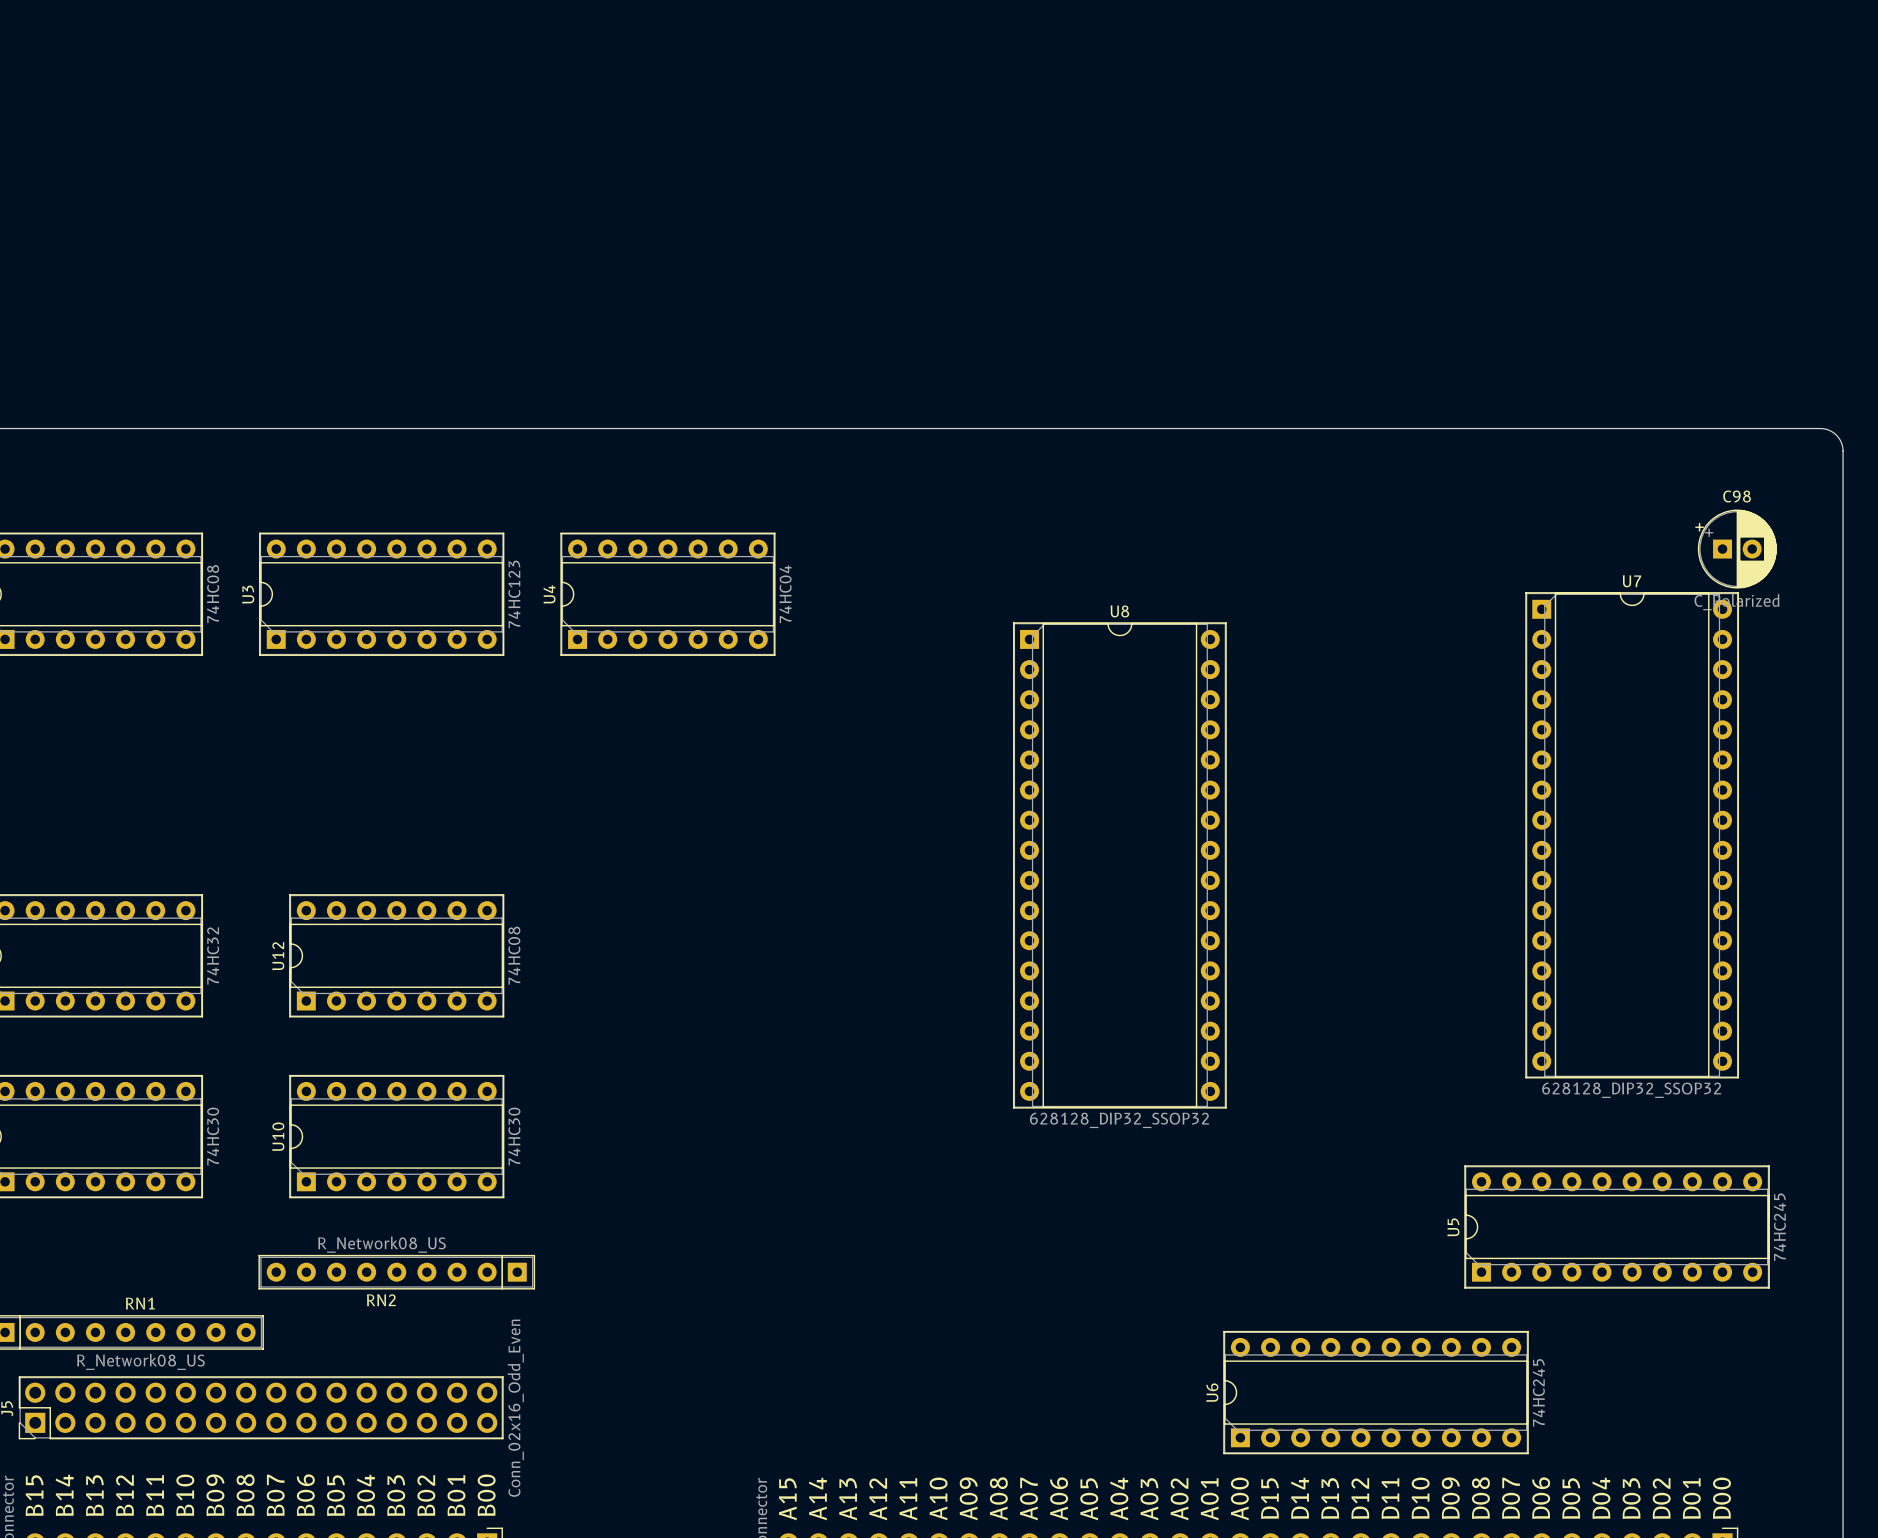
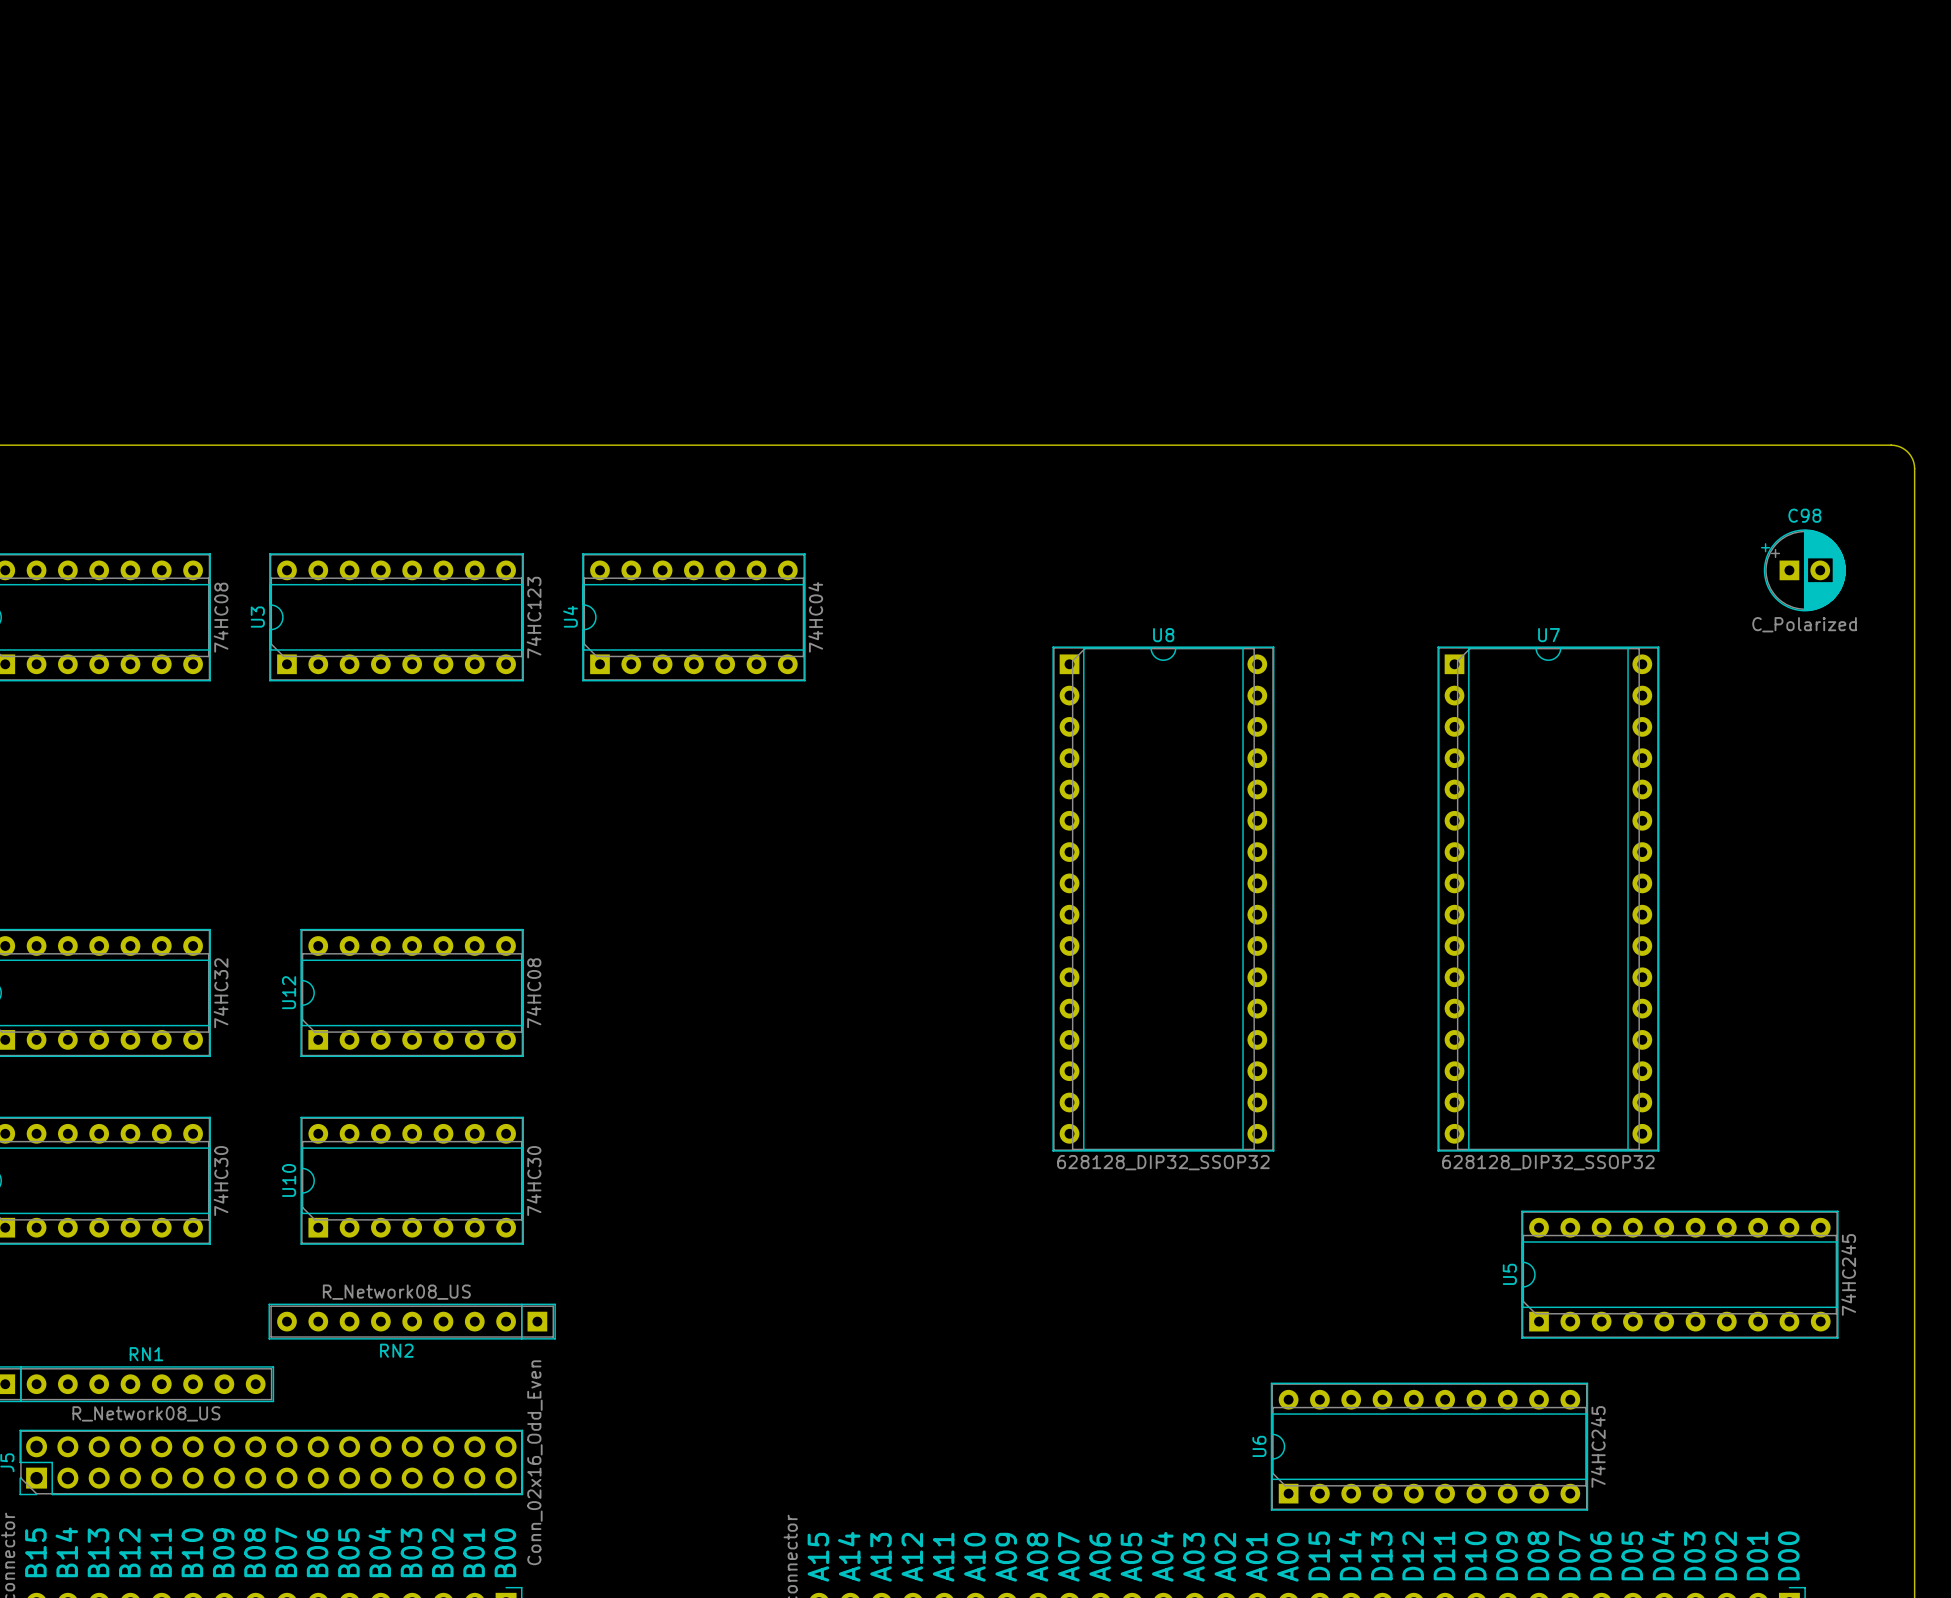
U7 position: (1632, 835) -> (1548, 899)

